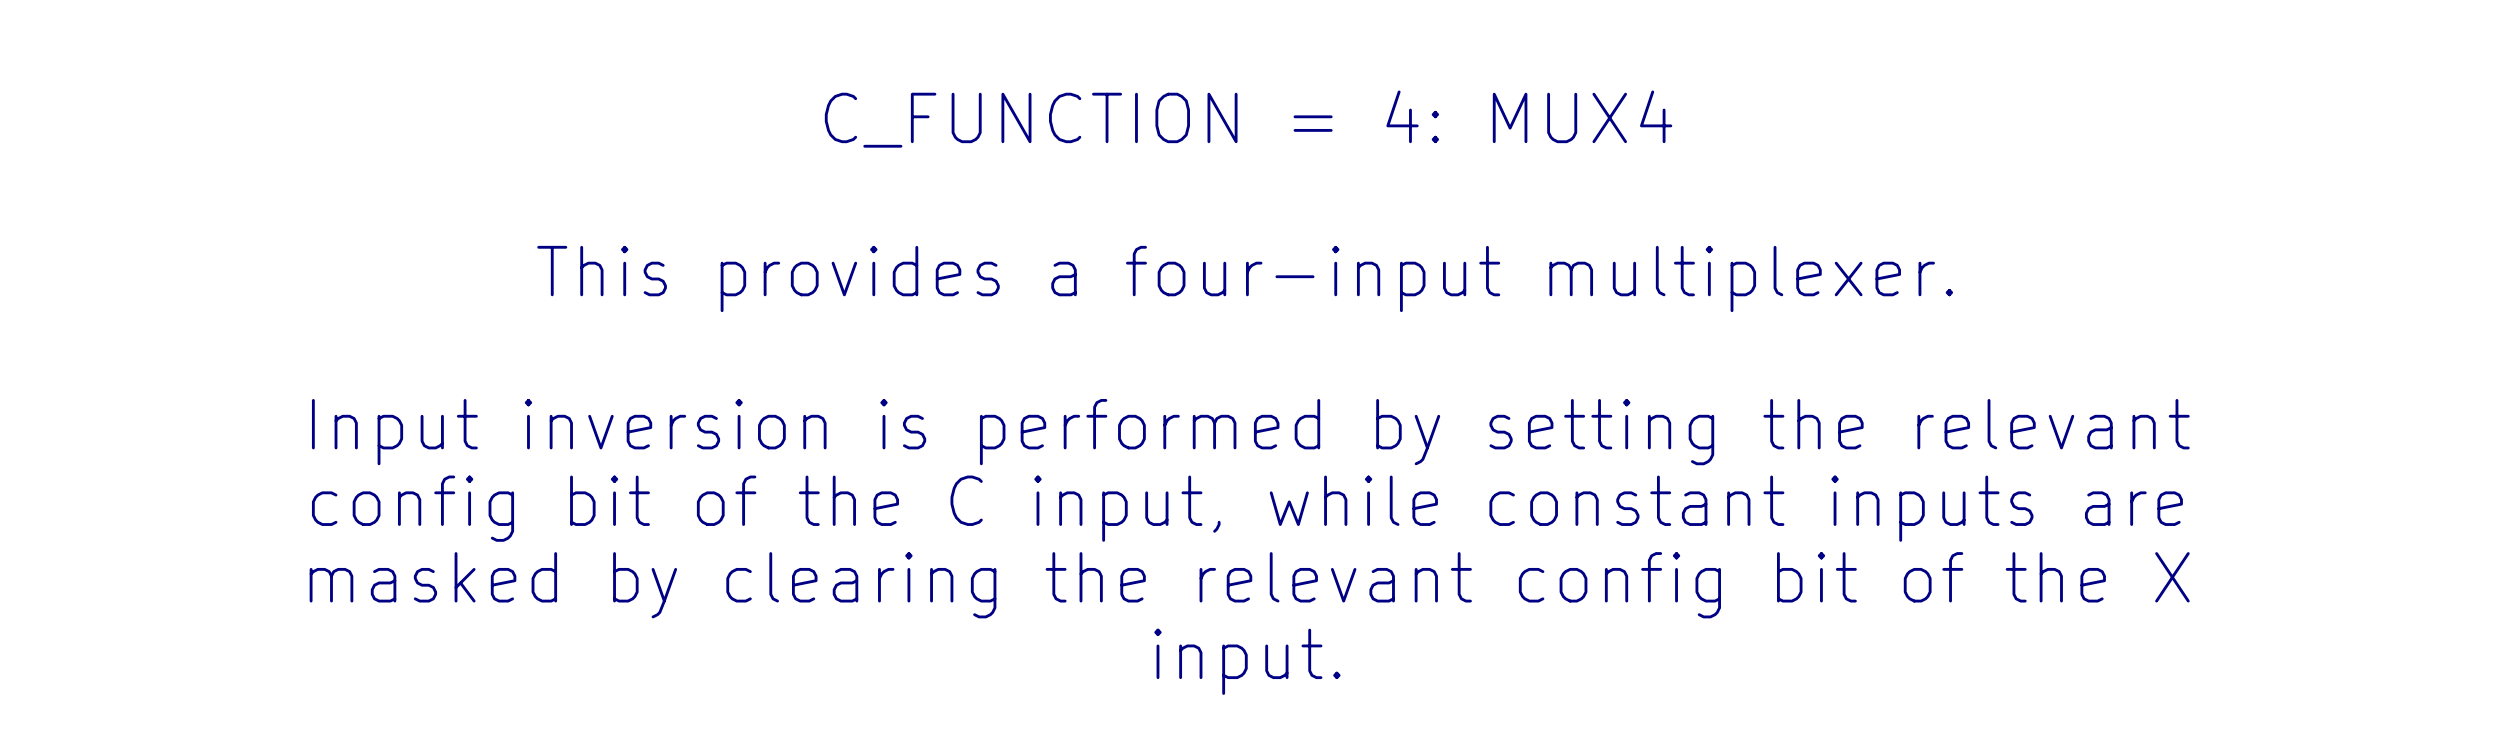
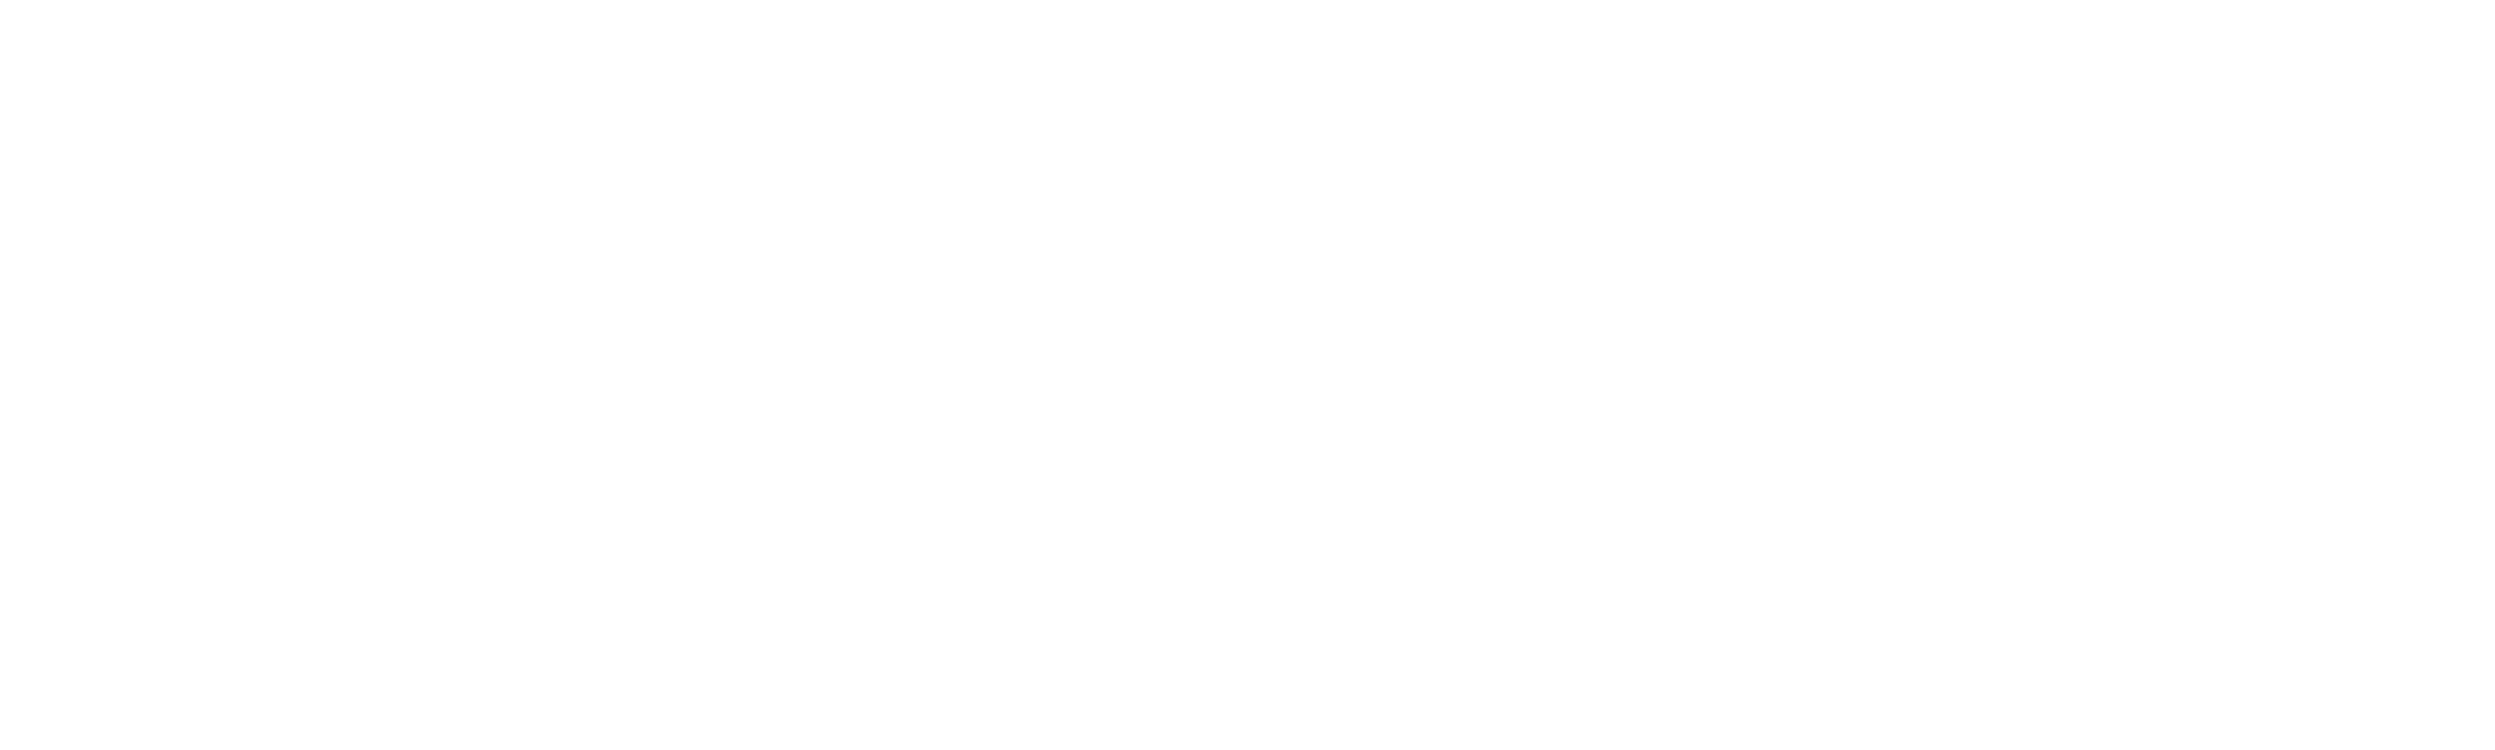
text: C_FUNCTION = 4: MUX4 (1248, 119) -> none
text: This provides a four-input multiplexer. (1245, 278) -> none
text: Input inversion is performed by setting the relevant (1250, 432) -> none
text: config bit of the C input, while constant inputs are (1247, 508) -> none
text: masked by clearing the relevant config bit of the X (1249, 585) -> none
text: input. (1247, 661) -> none

